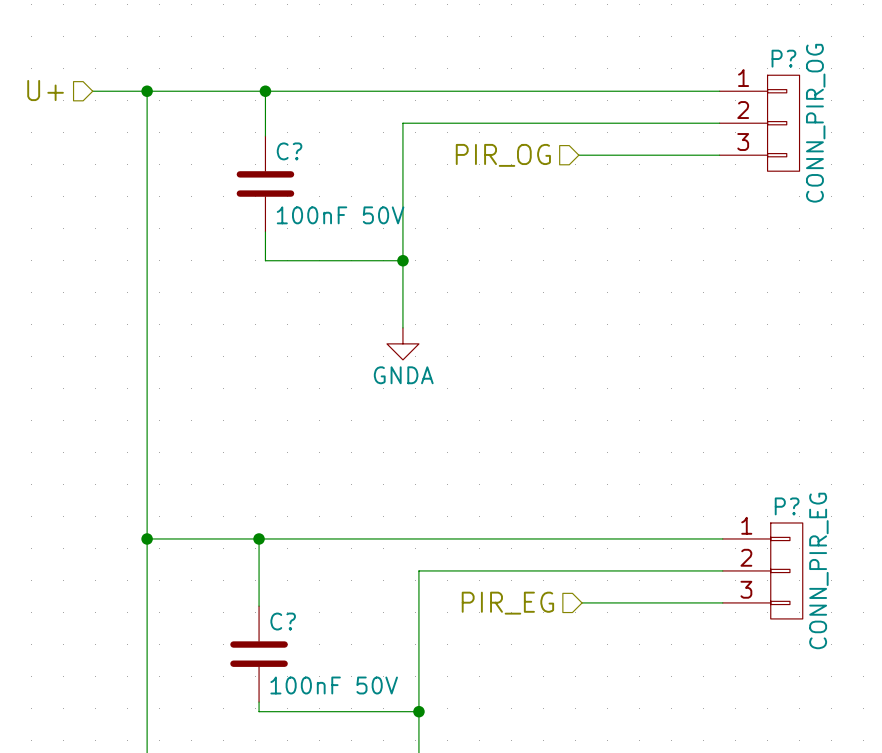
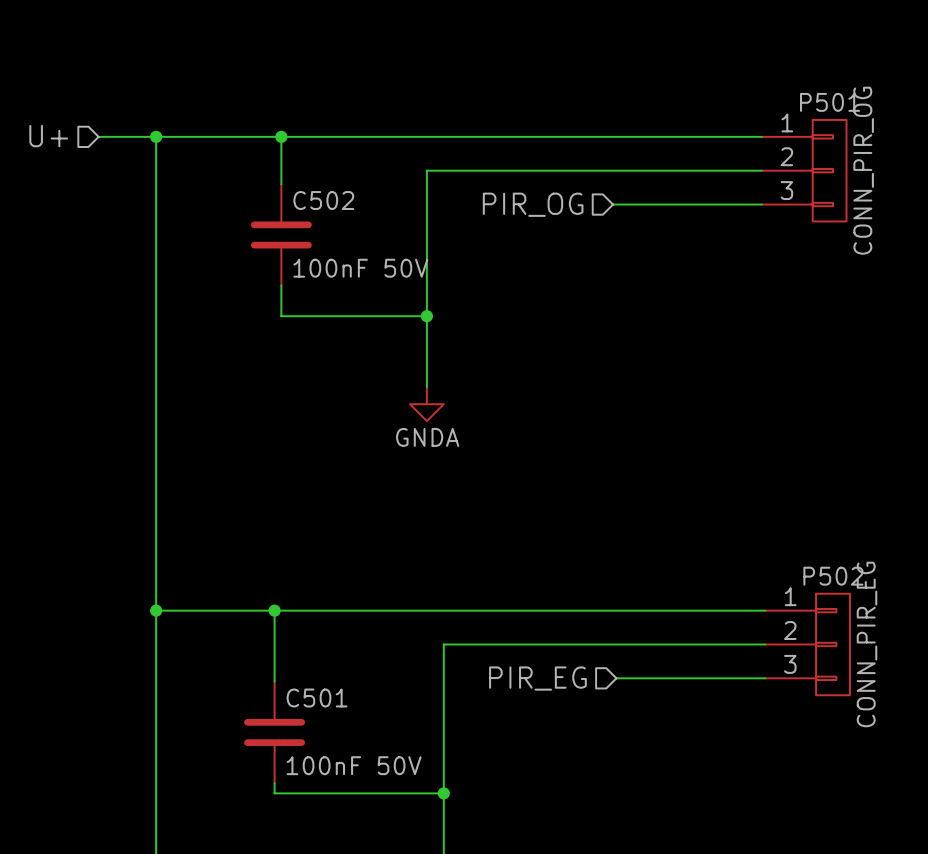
P? name: P? (783, 58) -> P501 (830, 102)
C? name: C? (289, 151) -> C502 (323, 200)
P? name: P? (787, 506) -> P502 (833, 576)
C? name: C? (283, 621) -> C501 (317, 698)

